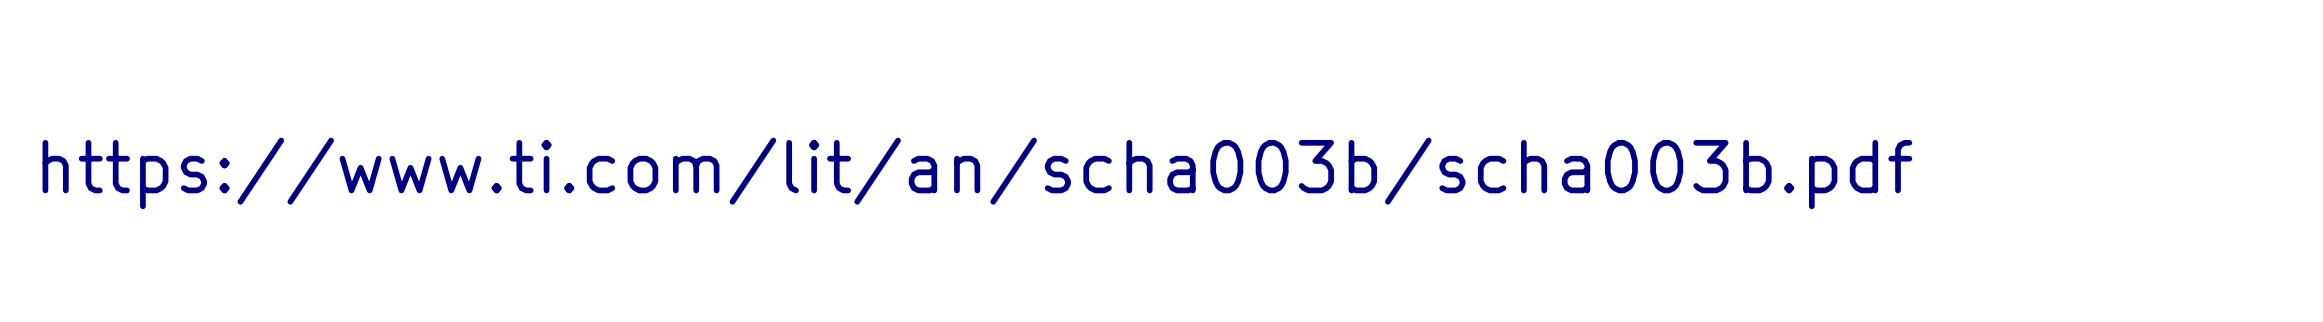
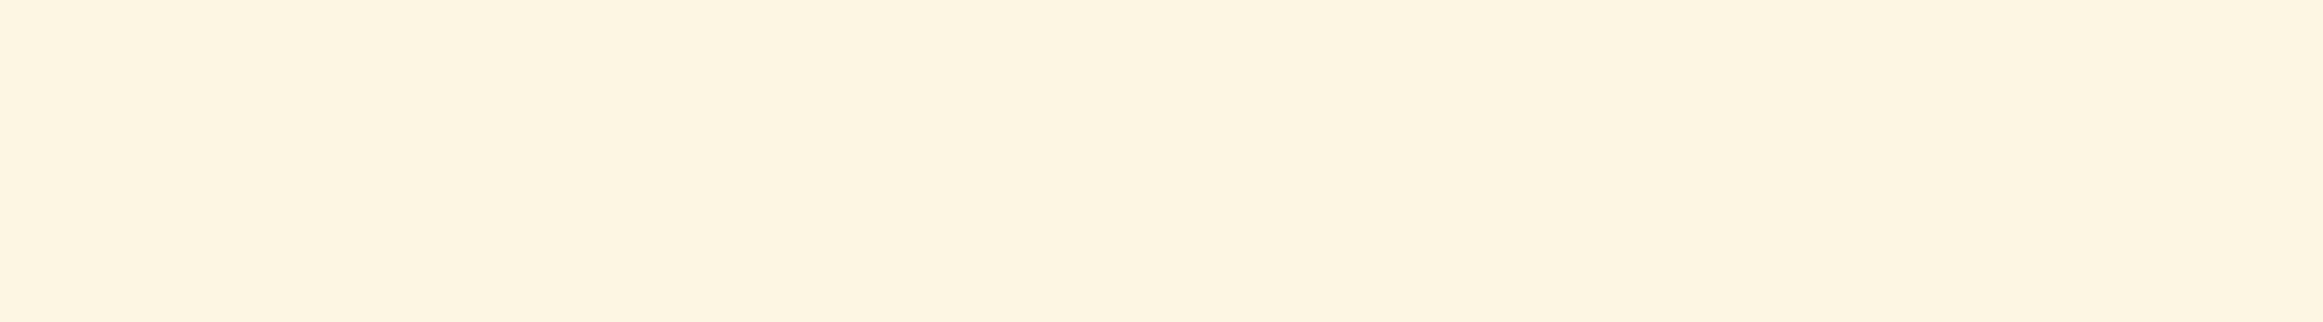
text: https://www.ti.com/lit/an/scha003b/scha003b.pdf (977, 173) -> none

